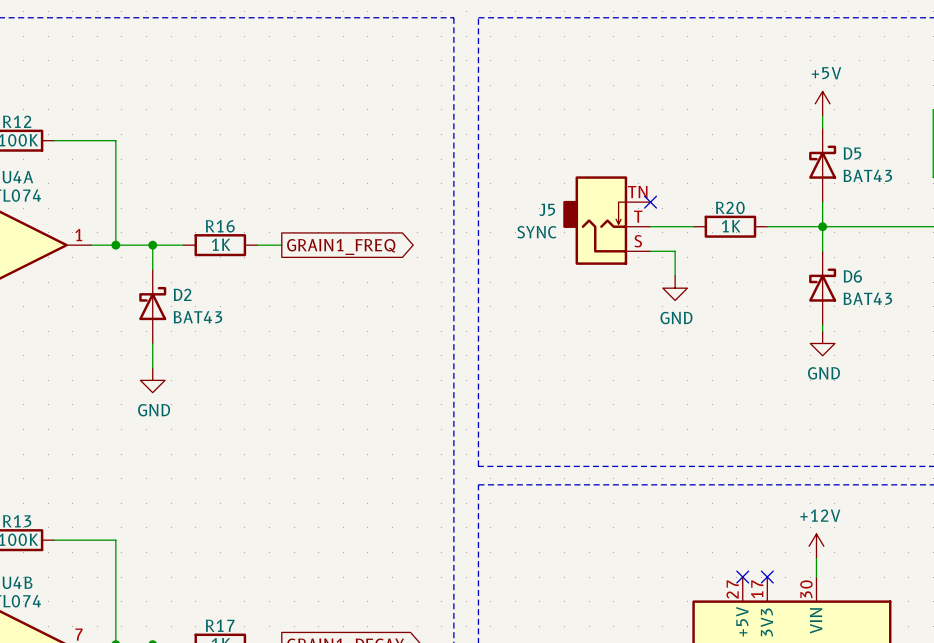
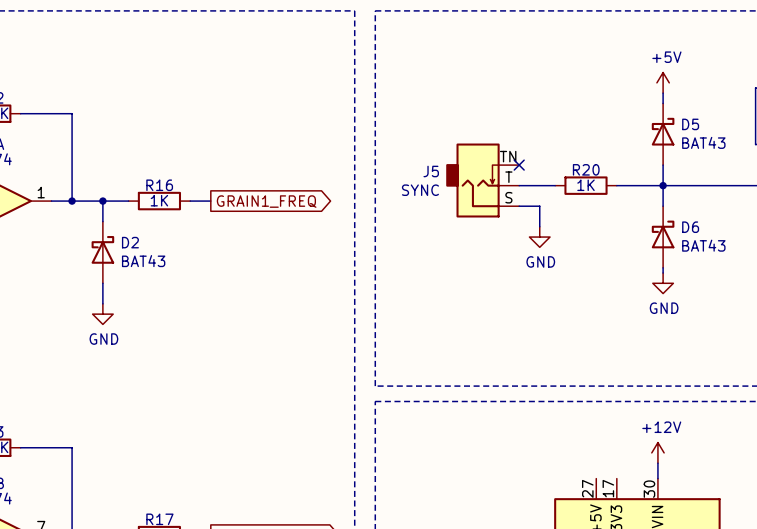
no-connect mark: (742, 577) -> none
no-connect mark: (767, 577) -> none

